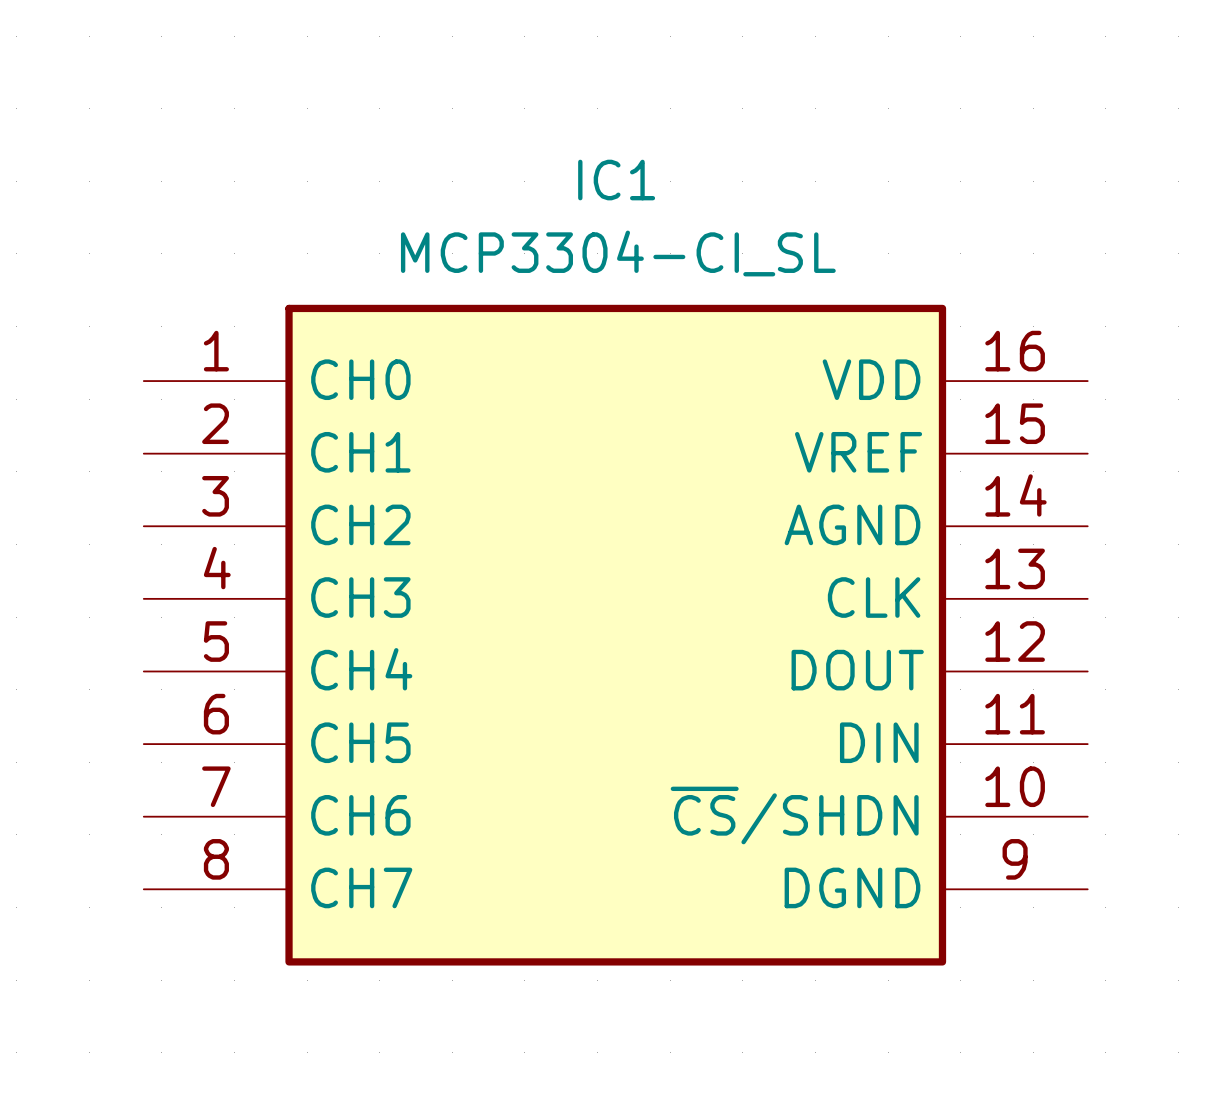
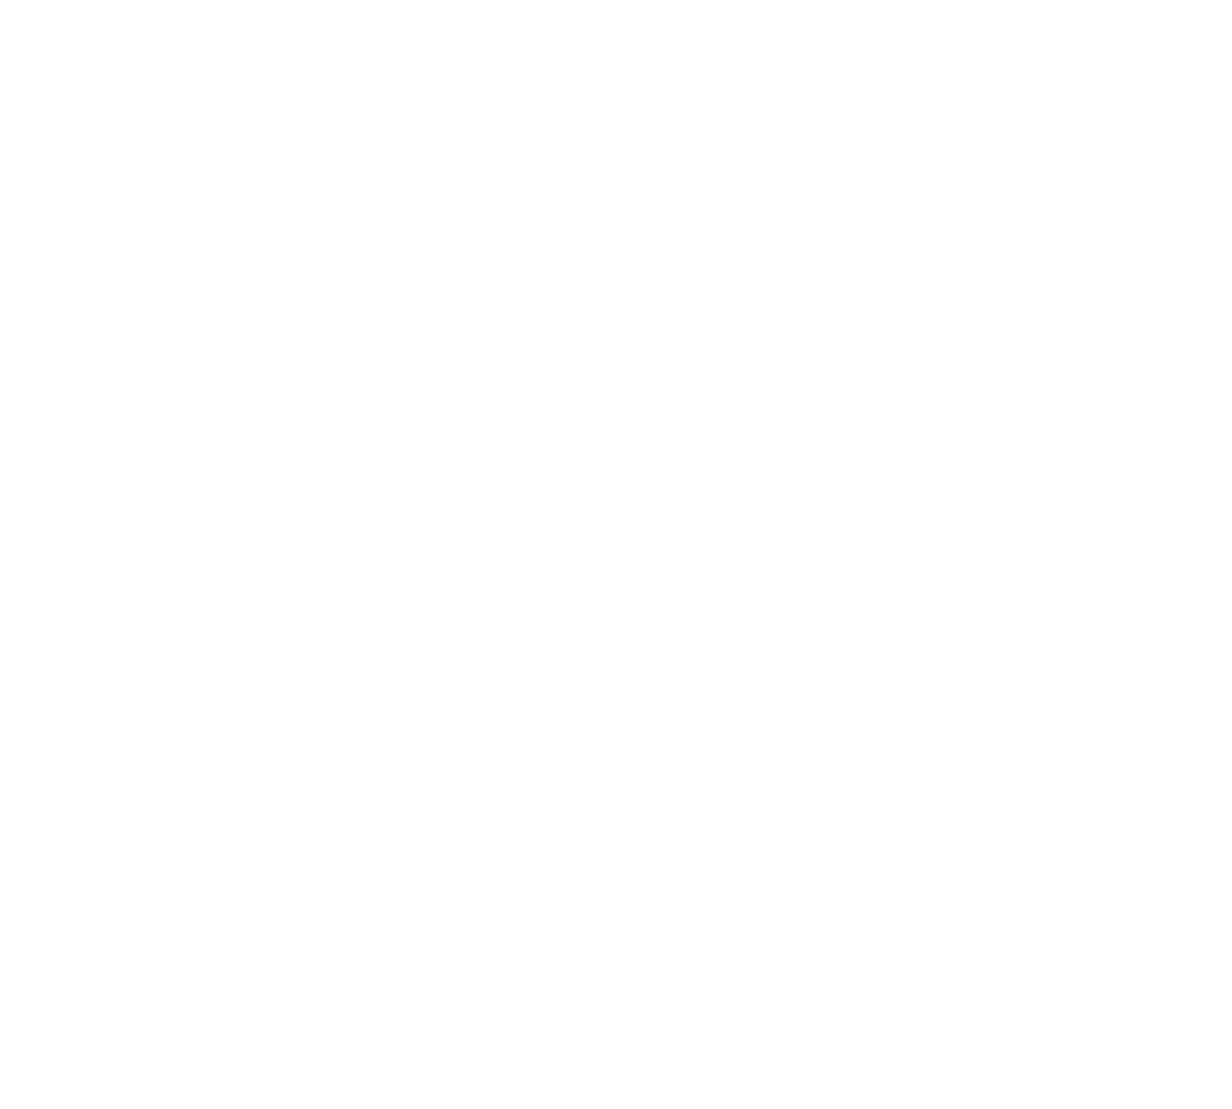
IC1: MCP3304-CI_SL (615, 635) -> none

